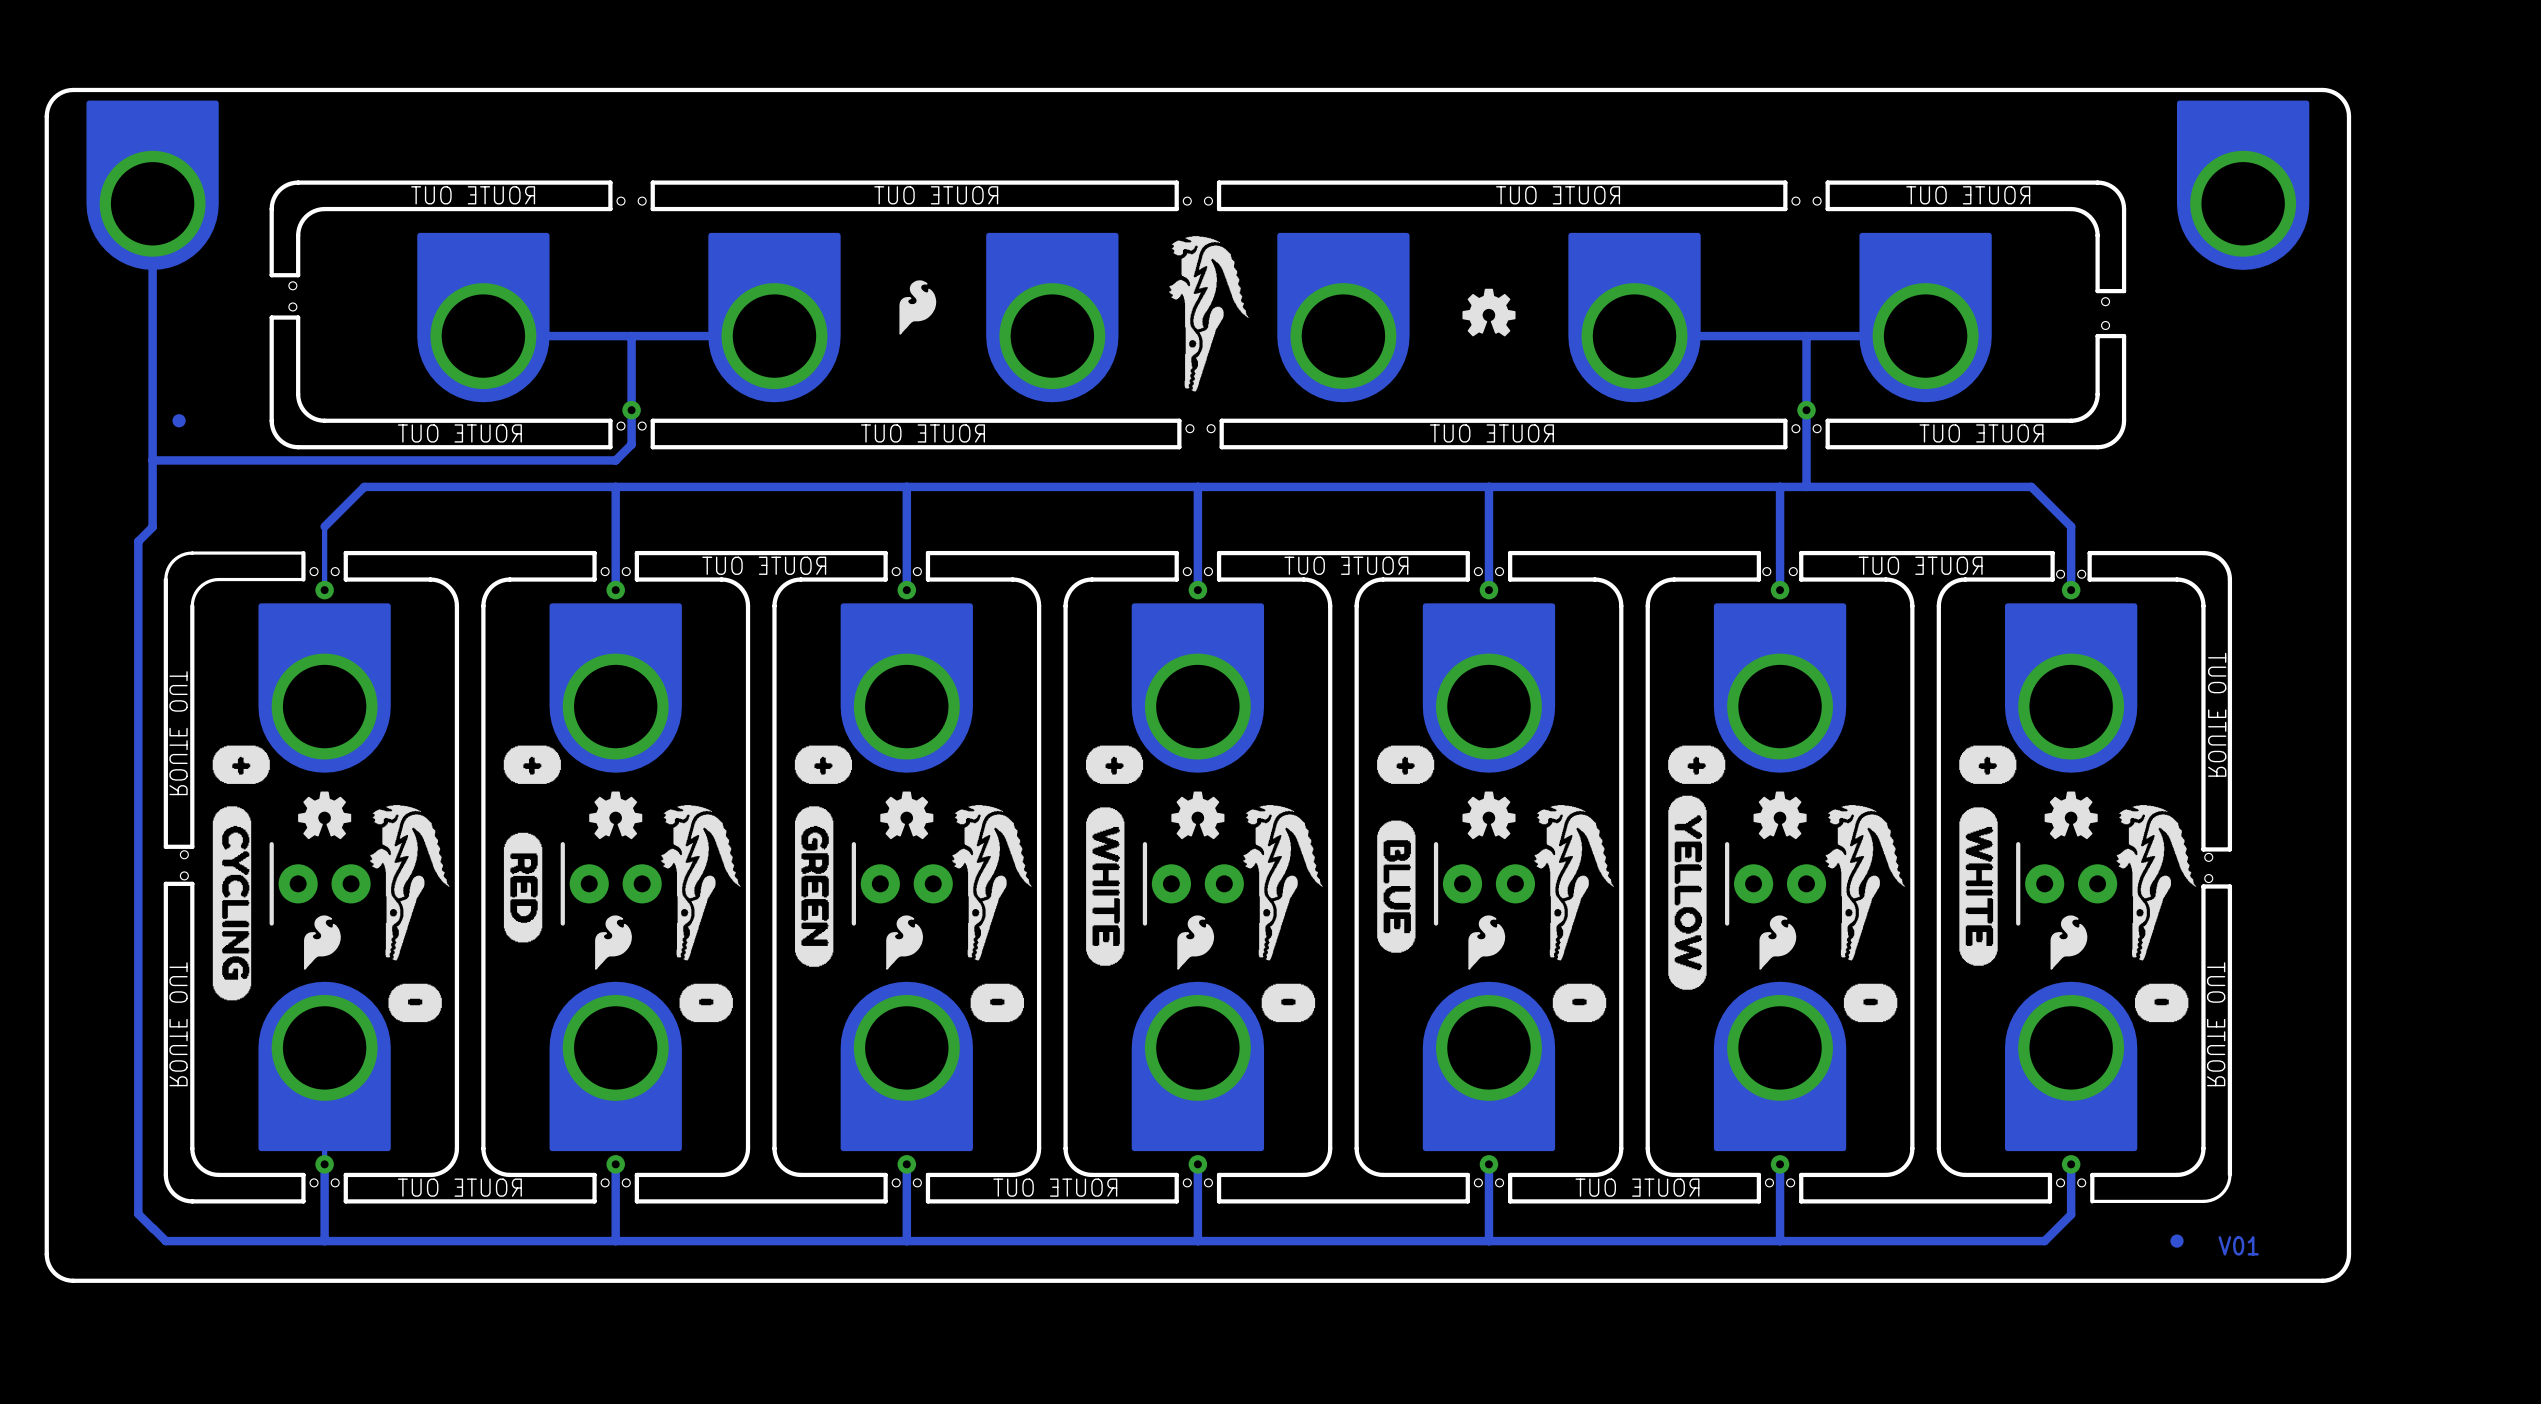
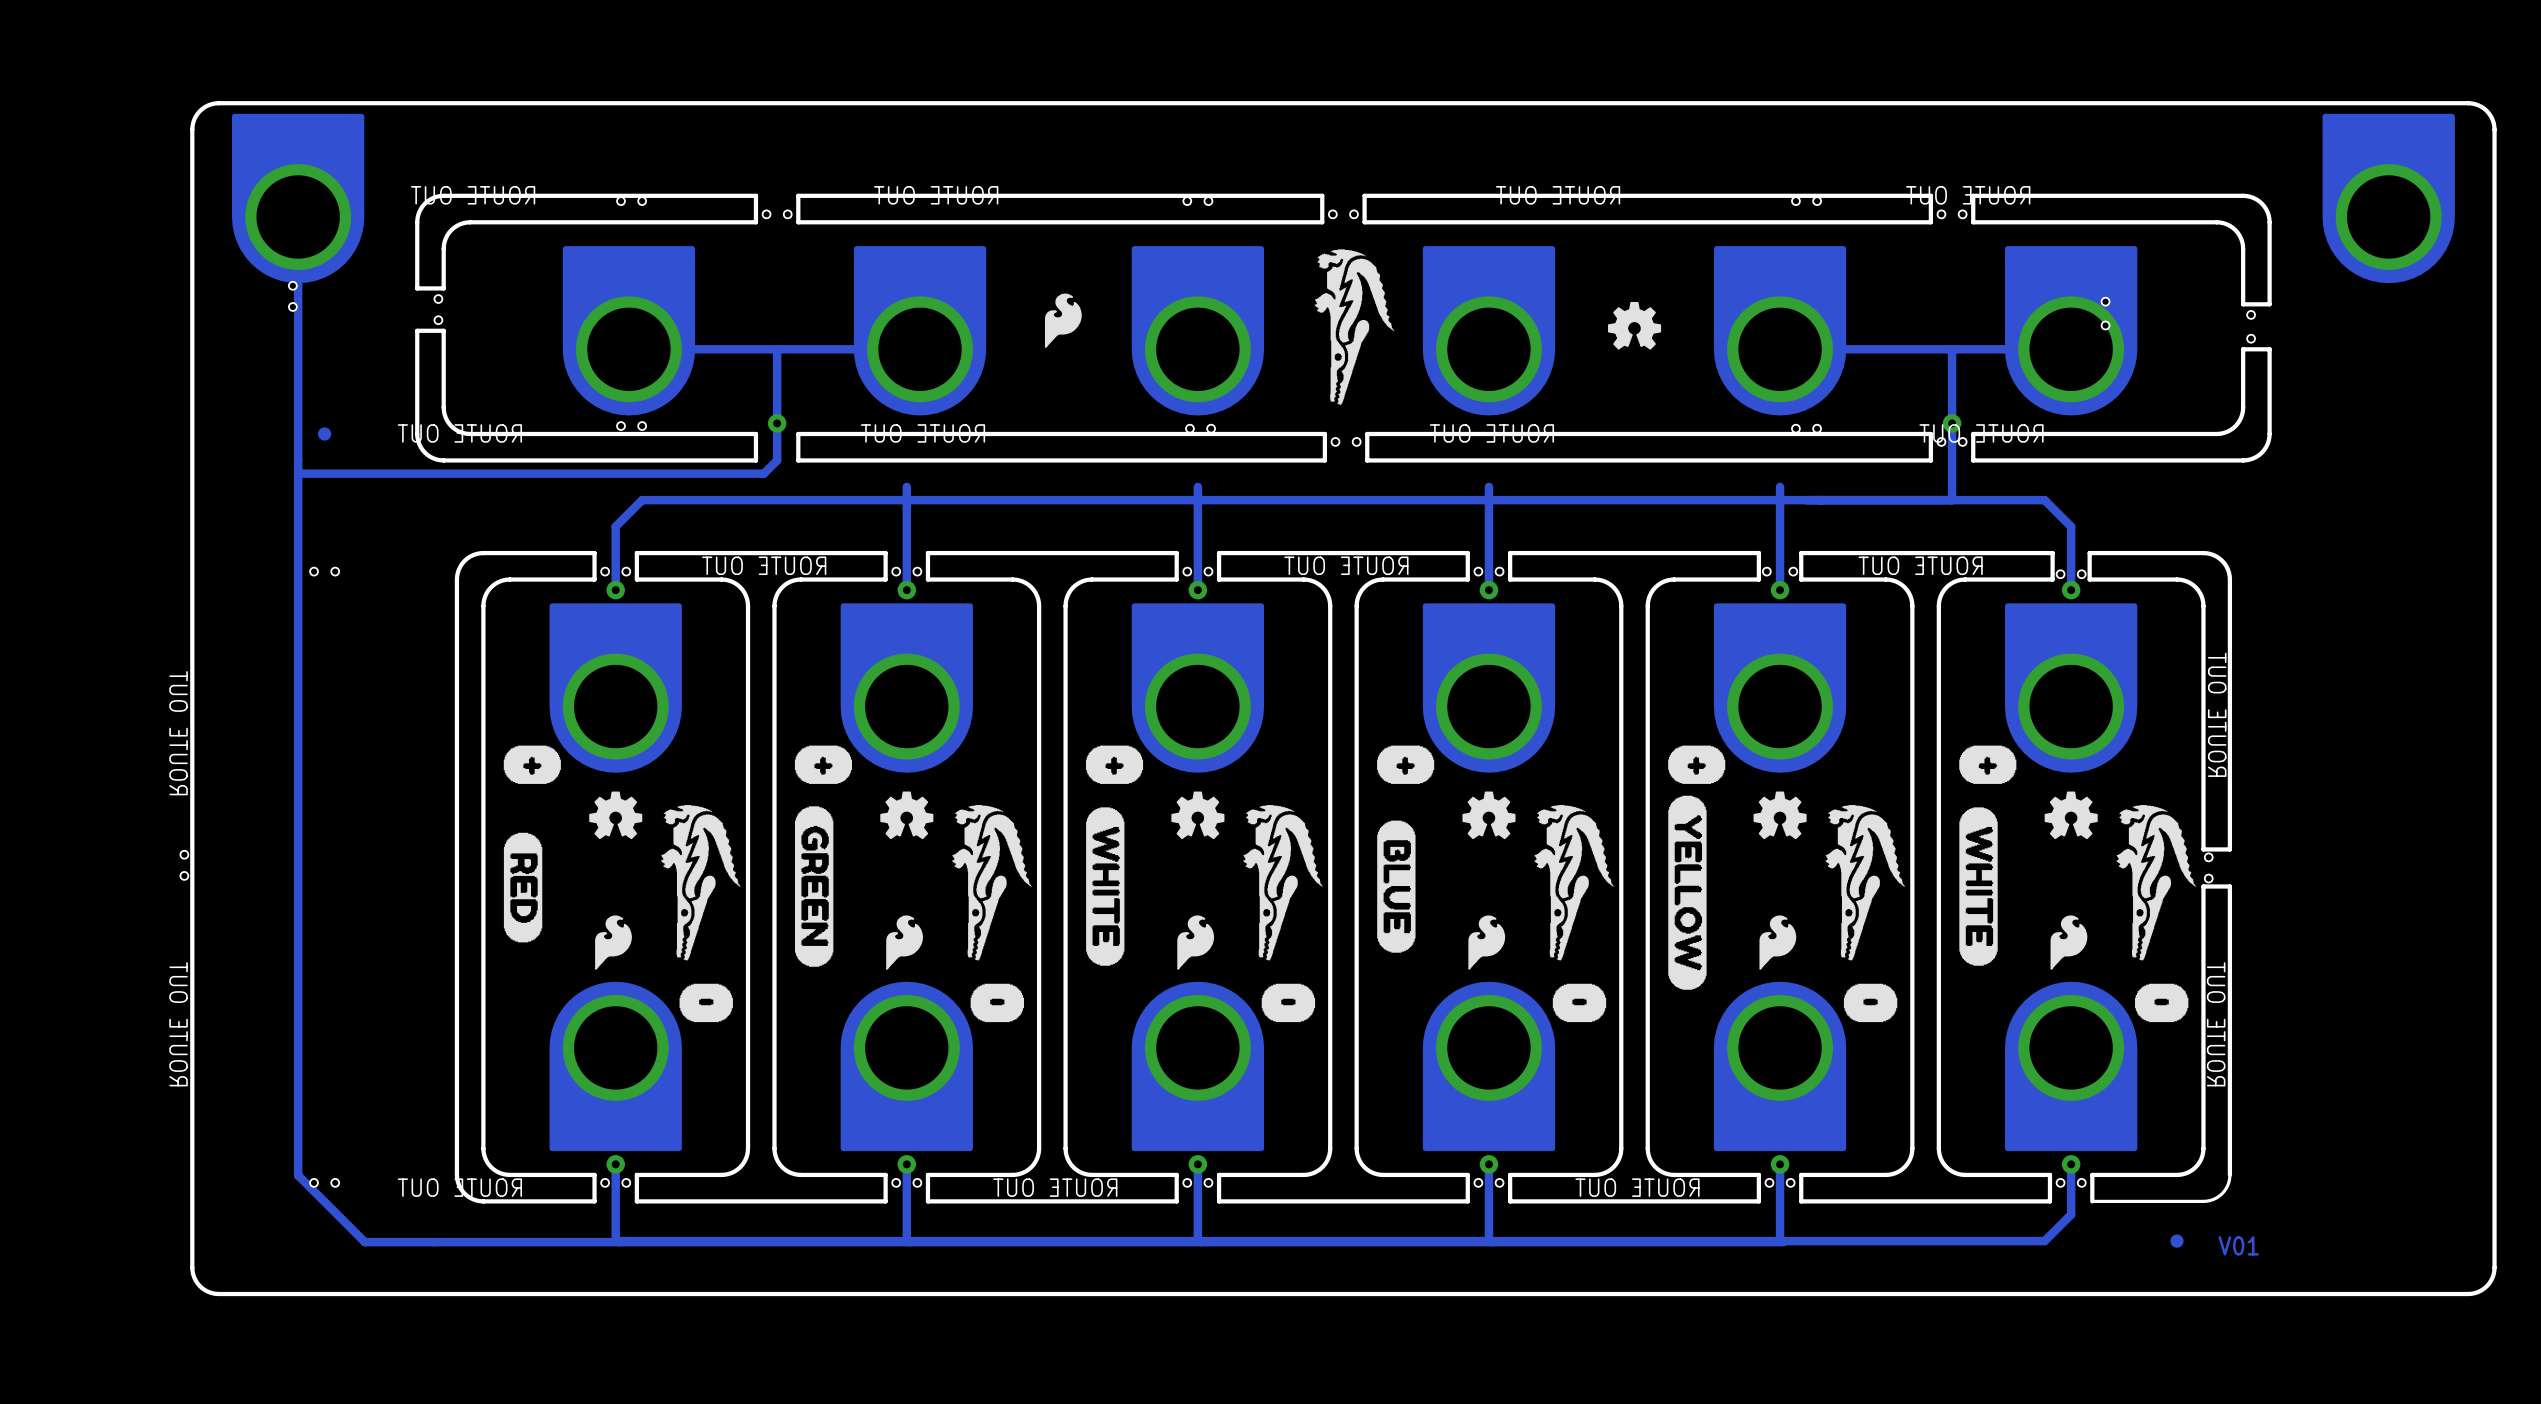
board edge: (2322, 89) (73, 89) (59, 93) (50, 103) (46, 116) (46, 1254) (50, 1267) (59, 1277) (73, 1280) (2322, 1280) (2335, 1277) (2345, 1267) (2348, 1254) (2348, 116) (2346, 106) (2341, 97) (2332, 91) (2322, 89) -> none
board edge: (610, 182) (610, 209) (317, 209) (305, 216) (299, 228) (298, 275) (271, 275) (272, 202) (279, 190) (291, 183) (610, 182) -> (755, 195) (755, 222) (463, 223) (451, 230) (444, 241) (443, 288) (417, 288) (418, 215) (424, 203) (436, 196) (755, 195)
board edge: (1176, 182) (1176, 209) (652, 209) (652, 182) (1176, 182) -> (1322, 195) (1322, 222) (798, 222) (798, 195) (1322, 195)
board edge: (1785, 182) (1785, 209) (1219, 209) (1219, 182) (1785, 182) -> (1930, 195) (1930, 222) (1364, 222) (1364, 195) (1930, 195)
board edge: (2097, 182) (1827, 182) (1827, 209) (2077, 209) (2089, 216) (2096, 228) (2097, 291) (2124, 291) (2123, 202) (2113, 188) (2097, 182) -> (2243, 195) (1973, 195) (1973, 222) (2223, 223) (2235, 230) (2242, 241) (2243, 304) (2269, 304) (2268, 215) (2259, 201) (2243, 195)
part: (152, 185) -> none
part: (2243, 185) -> none
part: none -> (298, 198)
part: none -> (2388, 198)
track: (152, 203) (152, 527) (138, 541) (138, 1214) (165, 1241) (615, 1241) -> none
hole: none -> (766, 214)
hole: none -> (787, 214)
hole: none -> (1332, 214)
hole: none -> (1354, 214)
hole: none -> (1941, 214)
hole: none -> (1962, 214)
track: none -> (298, 216) (298, 1175) (364, 1242) (1783, 1242)
hole: none -> (438, 299)
drawing position: (917, 307) -> (1063, 320)
drawing position: (1489, 312) -> (1634, 325)
drawing position: (1209, 313) -> (1354, 327)
hole: none -> (2251, 314)
board edge: (298, 317) (298, 397) (303, 410) (314, 418) (324, 420) (610, 420) (610, 447) (298, 447) (288, 445) (277, 436) (271, 424) (271, 317) (298, 317) -> (443, 330) (443, 410) (449, 423) (460, 431) (470, 433) (755, 433) (755, 460) (443, 460) (433, 458) (422, 450) (417, 437) (417, 330) (443, 330)
part: (483, 317) -> none
part: (774, 317) -> none
part: (1052, 317) -> none
part: (1343, 317) -> none
part: (1634, 317) -> none
part: (1925, 317) -> none
hole: none -> (438, 320)
part: none -> (628, 330)
part: none -> (920, 330)
part: none -> (1197, 330)
part: none -> (1488, 330)
part: none -> (1780, 330)
part: none -> (2071, 330)
track: (631, 336) (631, 444) (615, 460) (152, 460) -> none
track: (774, 336) (483, 336) -> (920, 349) (628, 349)
track: (1806, 336) (1806, 486) -> (1952, 349) (1952, 500)
track: (1925, 336) (1634, 336) -> (2071, 349) (1780, 349)
board edge: (2124, 336) (2123, 424) (2118, 436) (2107, 445) (2097, 447) (1827, 447) (1827, 420) (2071, 420) (2081, 418) (2092, 410) (2097, 397) (2097, 336) (2124, 336) -> (2269, 349) (2269, 437) (2264, 450) (2253, 458) (2243, 460) (1973, 460) (1973, 433) (2216, 433) (2226, 431) (2237, 423) (2242, 410) (2243, 349) (2269, 349)
hole: none -> (2251, 338)
track: none -> (777, 349) (777, 460) (763, 473) (298, 473)
via: (631, 410) -> none
via: (1806, 410) -> none
part position: (179, 420) -> (324, 433)
board edge: (1179, 420) (652, 420) (652, 447) (1179, 447) (1179, 420) -> (1324, 433) (798, 433) (798, 460) (1324, 460) (1324, 433)
board edge: (1785, 420) (1221, 420) (1221, 447) (1785, 447) (1785, 420) -> (1930, 433) (1367, 433) (1367, 460) (1930, 460) (1930, 433)
via: none -> (777, 423)
via: none -> (1952, 423)
hole: none -> (1335, 441)
hole: none -> (1356, 441)
hole: none -> (1941, 441)
hole: none -> (1962, 441)
track: (615, 486) (615, 526) -> none
track: (2044, 500) (2031, 486) (364, 486) (324, 526) (324, 590) -> (2044, 500) (642, 500) (615, 526)
board edge: (483, 553) (345, 553) (345, 579) (437, 580) (451, 589) (456, 605) -> (483, 553) (470, 556) (460, 566) (457, 576) (456, 605)
via: (324, 590) -> none
board edge: (192, 605) (197, 589) (211, 580) (303, 579) (303, 553) (188, 553) (176, 558) (167, 569) (165, 579) (165, 846) (192, 846) -> (192, 883) (192, 846)
part: (324, 688) -> none
drawing: [212, 745, 270, 1001] -> none
drawing: [298, 791, 450, 1023] -> none
board edge: (192, 883) (165, 883) (165, 1174) (167, 1185) (176, 1195) (188, 1201) (303, 1201) (303, 1174) (211, 1174) (197, 1164) (192, 1148) -> (192, 605) (192, 129) (197, 113) (211, 104) (2468, 103) (2484, 108) (2493, 122) (2494, 1267) (2490, 1280) (2478, 1292) (2468, 1294) (218, 1294) (202, 1288) (195, 1280) (192, 1271) (192, 1148)
part: (320, 883) -> none
part: (611, 883) -> none
part: (902, 883) -> none
part: (1193, 883) -> none
part: (1484, 883) -> none
part: (1775, 883) -> none
part: (2066, 883) -> none
drawing: [304, 915, 341, 970] -> none
track: (324, 1047) (324, 1241) -> none
part: (324, 1066) -> none
board edge: (456, 1148) (451, 1164) (437, 1174) (345, 1174) (345, 1201) (483, 1201) -> (456, 1148) (457, 1178) (460, 1188) (470, 1197) (483, 1201)
via: (324, 1164) -> none

